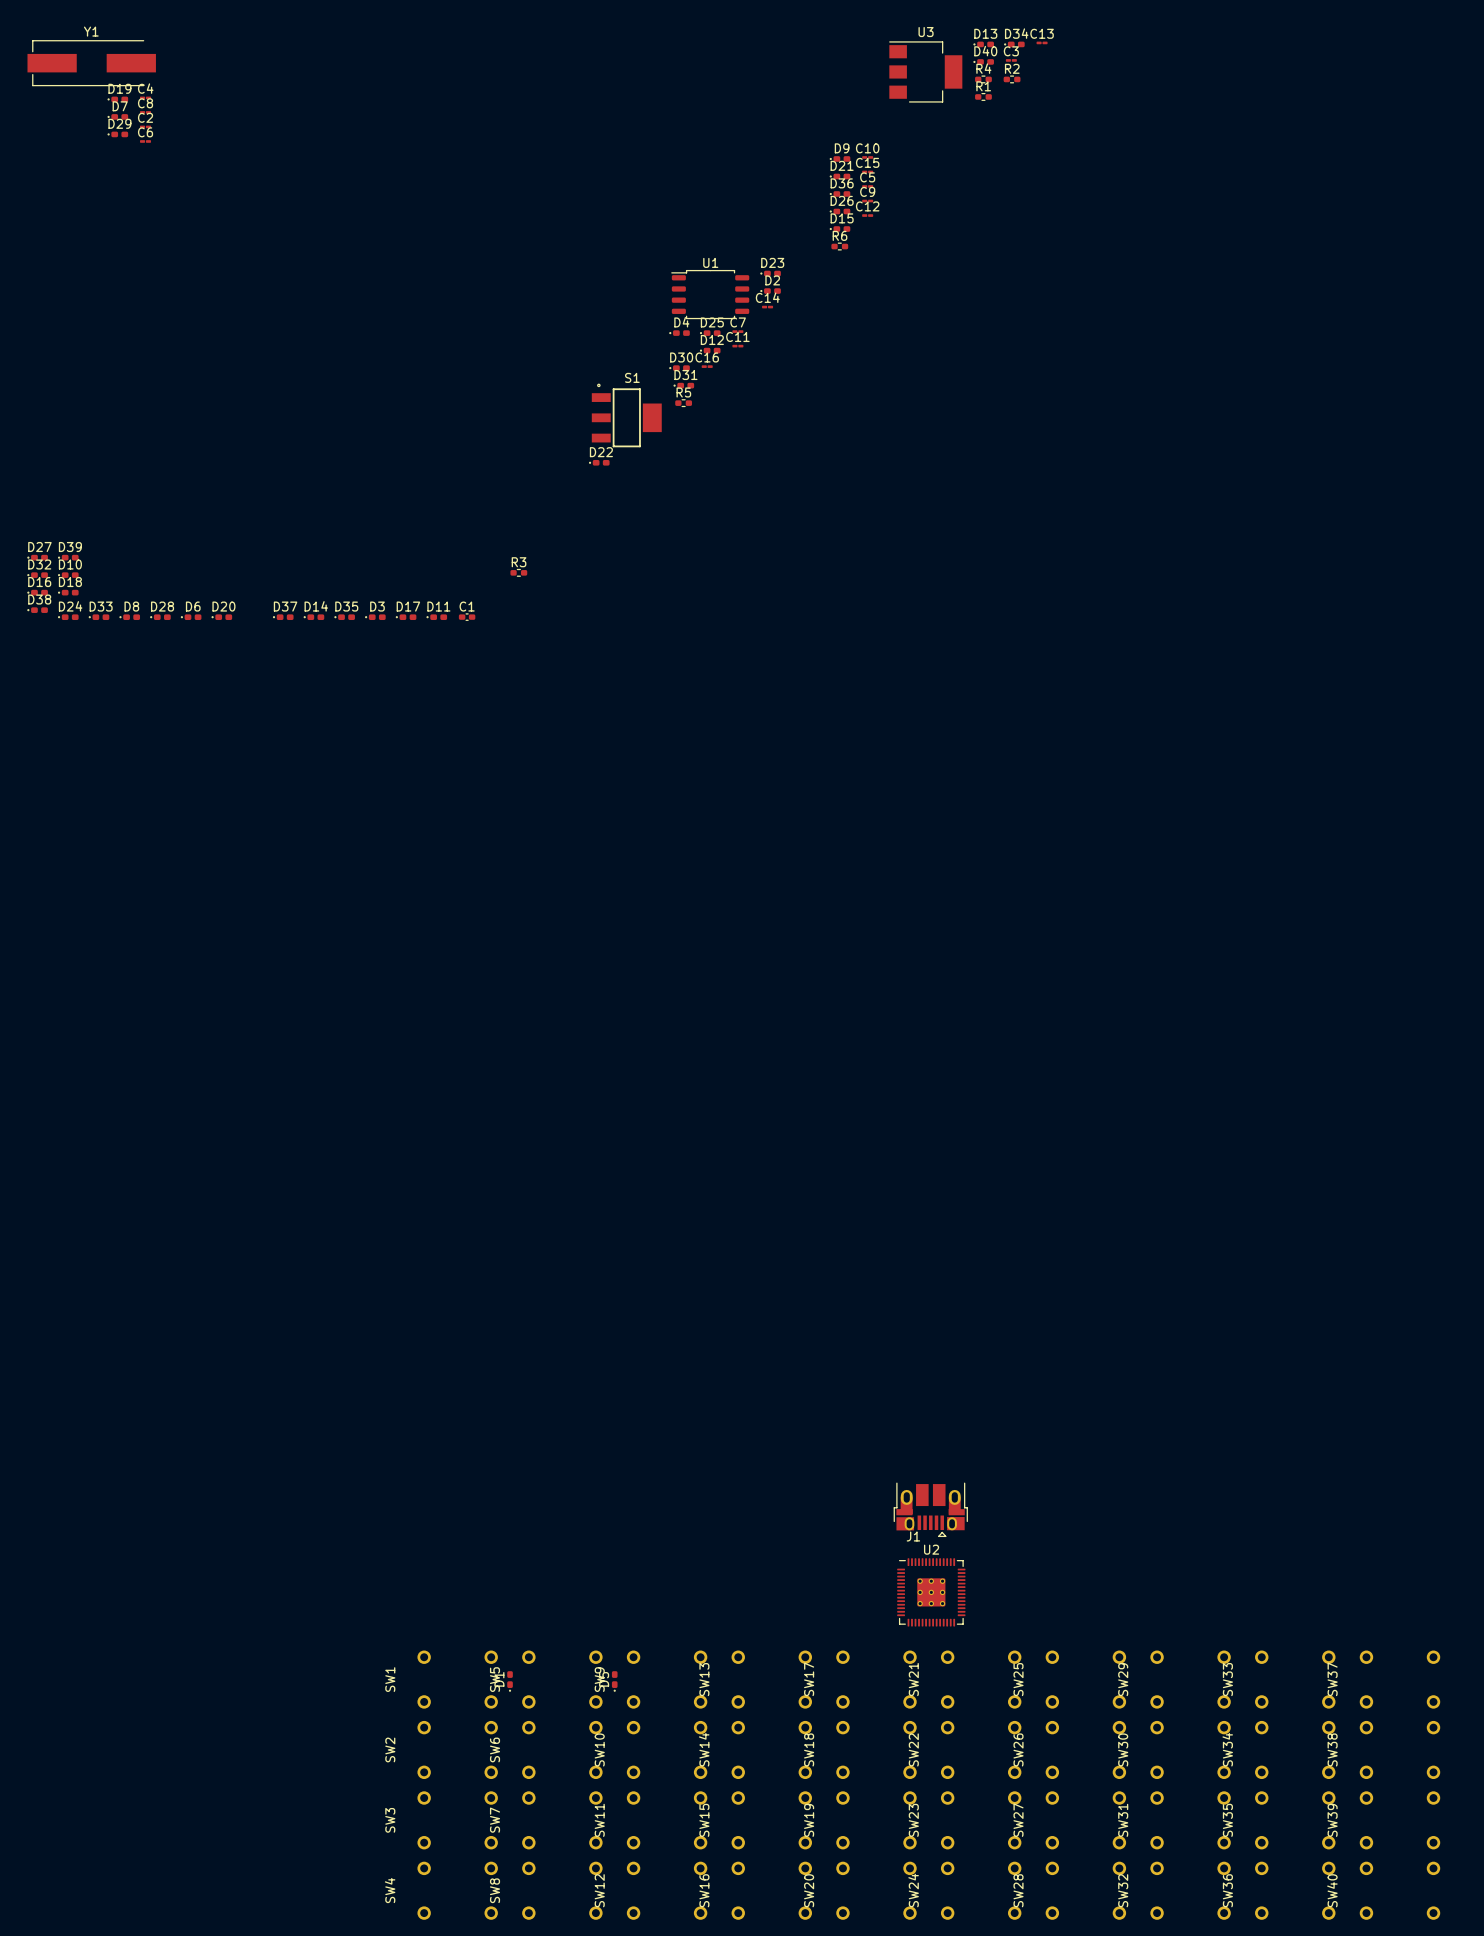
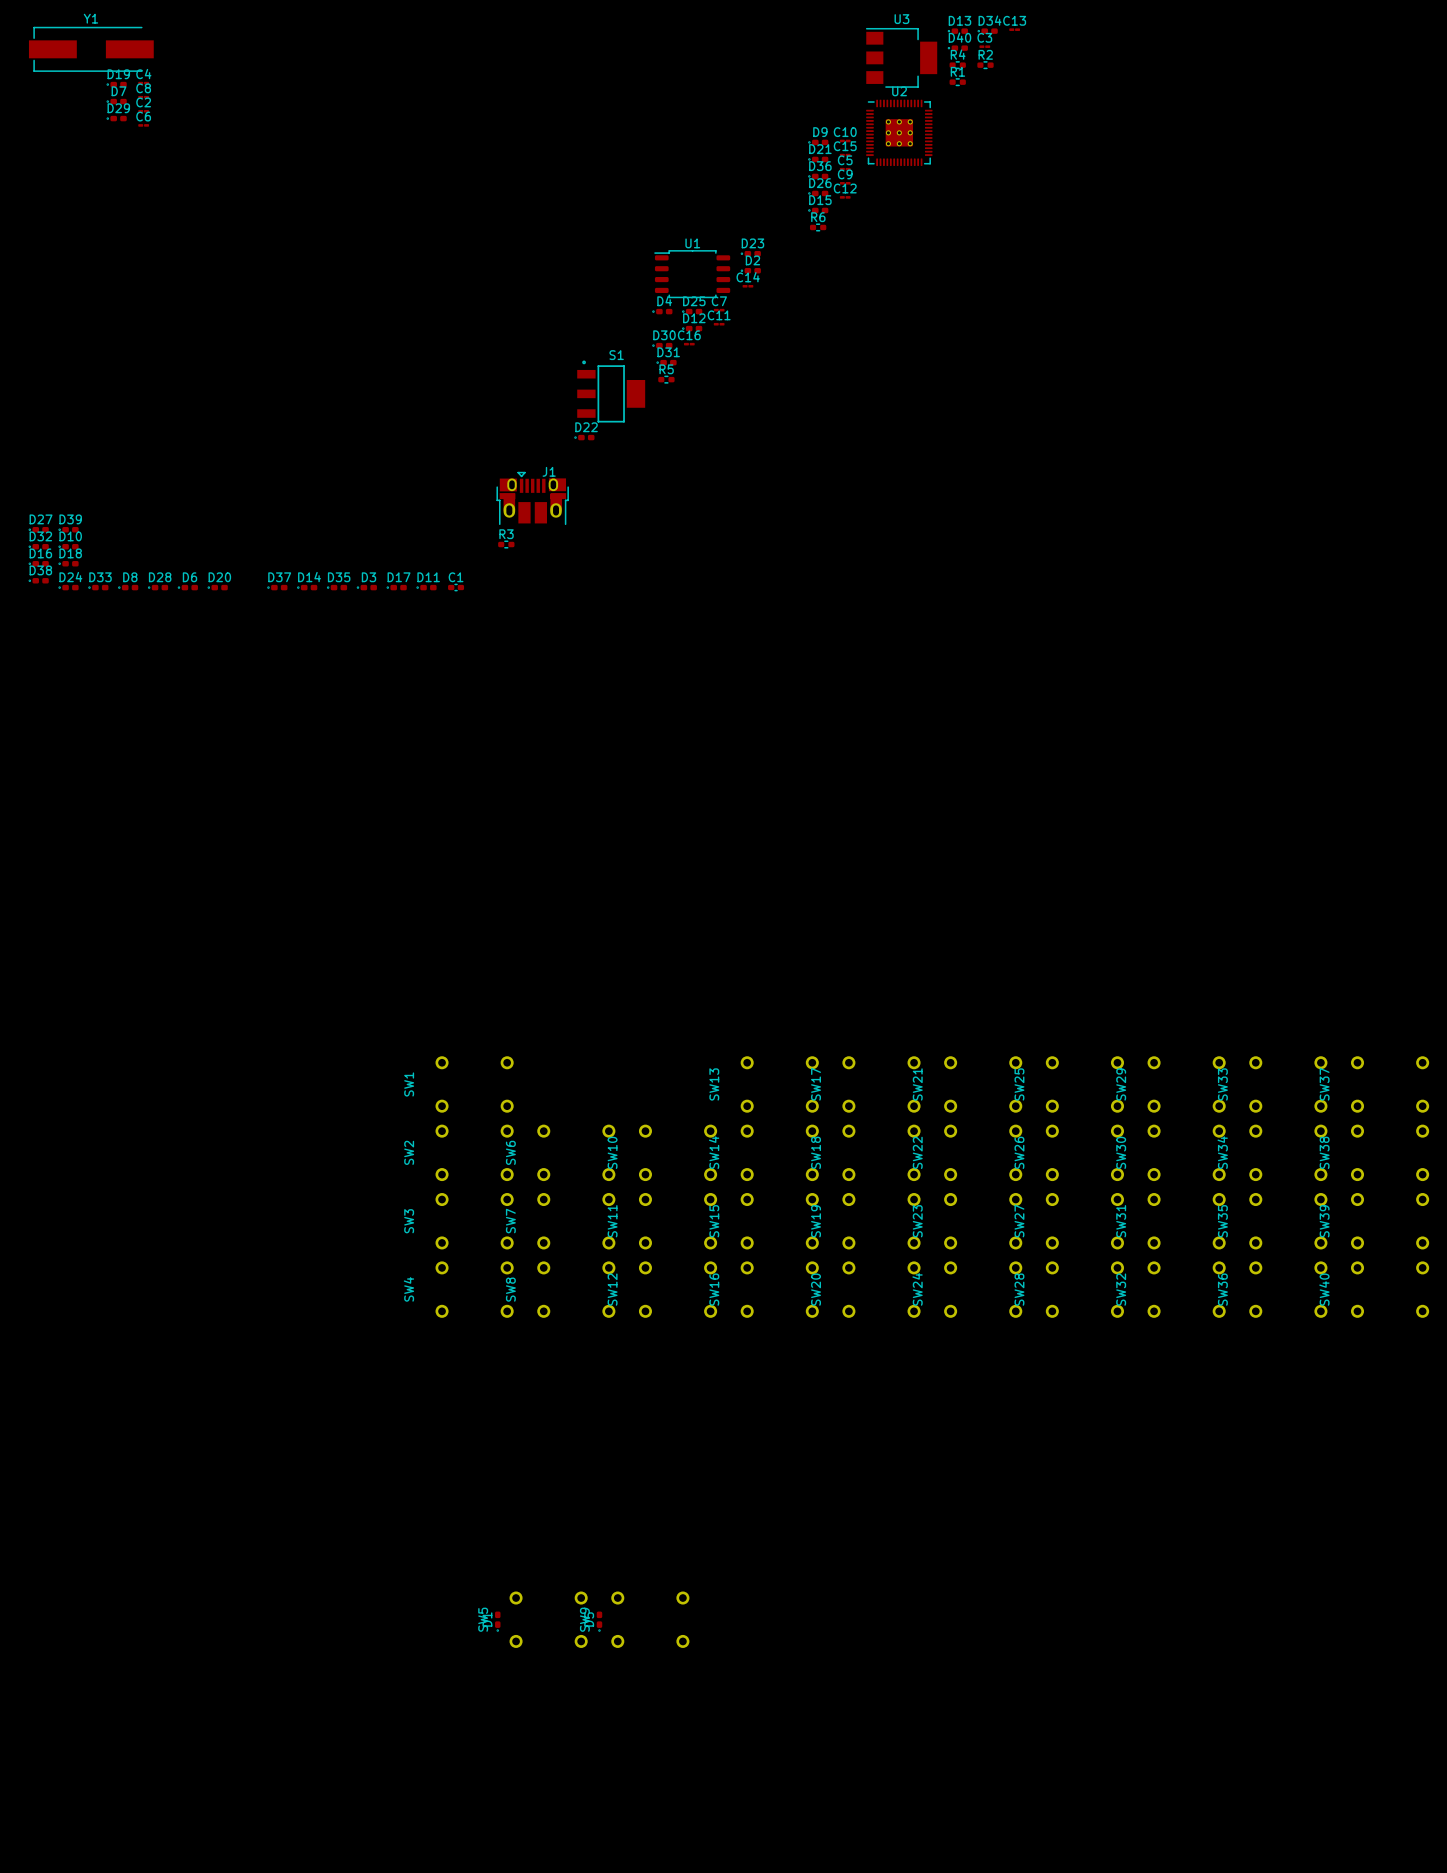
J1 rotation: 0° (930, 1509) -> 180° (532, 498)
J1 position: (930, 1509) -> (532, 498)
U2 position: (931, 1592) -> (899, 132)
SW1 position: (457, 1679) -> (474, 1084)
SW13 position: (771, 1679) -> (779, 1084)
SW17 position: (876, 1679) -> (881, 1084)
SW21 position: (981, 1679) -> (983, 1084)
SW25 position: (1085, 1679) -> (1084, 1084)
SW29 position: (1190, 1679) -> (1186, 1084)
SW33 position: (1295, 1679) -> (1288, 1084)
SW37 position: (1399, 1679) -> (1390, 1084)
SW2 position: (457, 1749) -> (474, 1152)
SW6 position: (562, 1749) -> (576, 1152)
SW10 position: (667, 1749) -> (678, 1152)
SW14 position: (771, 1749) -> (779, 1152)
SW18 position: (876, 1749) -> (881, 1152)
SW22 position: (981, 1749) -> (983, 1152)
SW26 position: (1085, 1749) -> (1084, 1152)
SW30 position: (1190, 1749) -> (1186, 1152)
SW34 position: (1295, 1749) -> (1288, 1152)
SW38 position: (1399, 1749) -> (1390, 1152)
SW3 position: (457, 1820) -> (474, 1221)
SW7 position: (562, 1820) -> (576, 1221)
SW11 position: (667, 1820) -> (678, 1221)
SW15 position: (771, 1820) -> (779, 1221)
SW19 position: (876, 1820) -> (881, 1221)
SW23 position: (981, 1820) -> (983, 1221)
SW27 position: (1085, 1820) -> (1084, 1221)
SW31 position: (1190, 1820) -> (1186, 1221)
SW35 position: (1295, 1820) -> (1288, 1221)
SW39 position: (1399, 1820) -> (1390, 1221)
SW4 position: (457, 1890) -> (474, 1289)
SW8 position: (562, 1890) -> (576, 1289)
SW12 position: (667, 1890) -> (678, 1289)
SW16 position: (771, 1890) -> (779, 1289)
SW20 position: (876, 1890) -> (881, 1289)
SW24 position: (981, 1890) -> (983, 1289)
SW28 position: (1085, 1890) -> (1084, 1289)
SW32 position: (1190, 1890) -> (1186, 1289)
SW36 position: (1295, 1890) -> (1288, 1289)
SW40 position: (1399, 1890) -> (1390, 1289)

